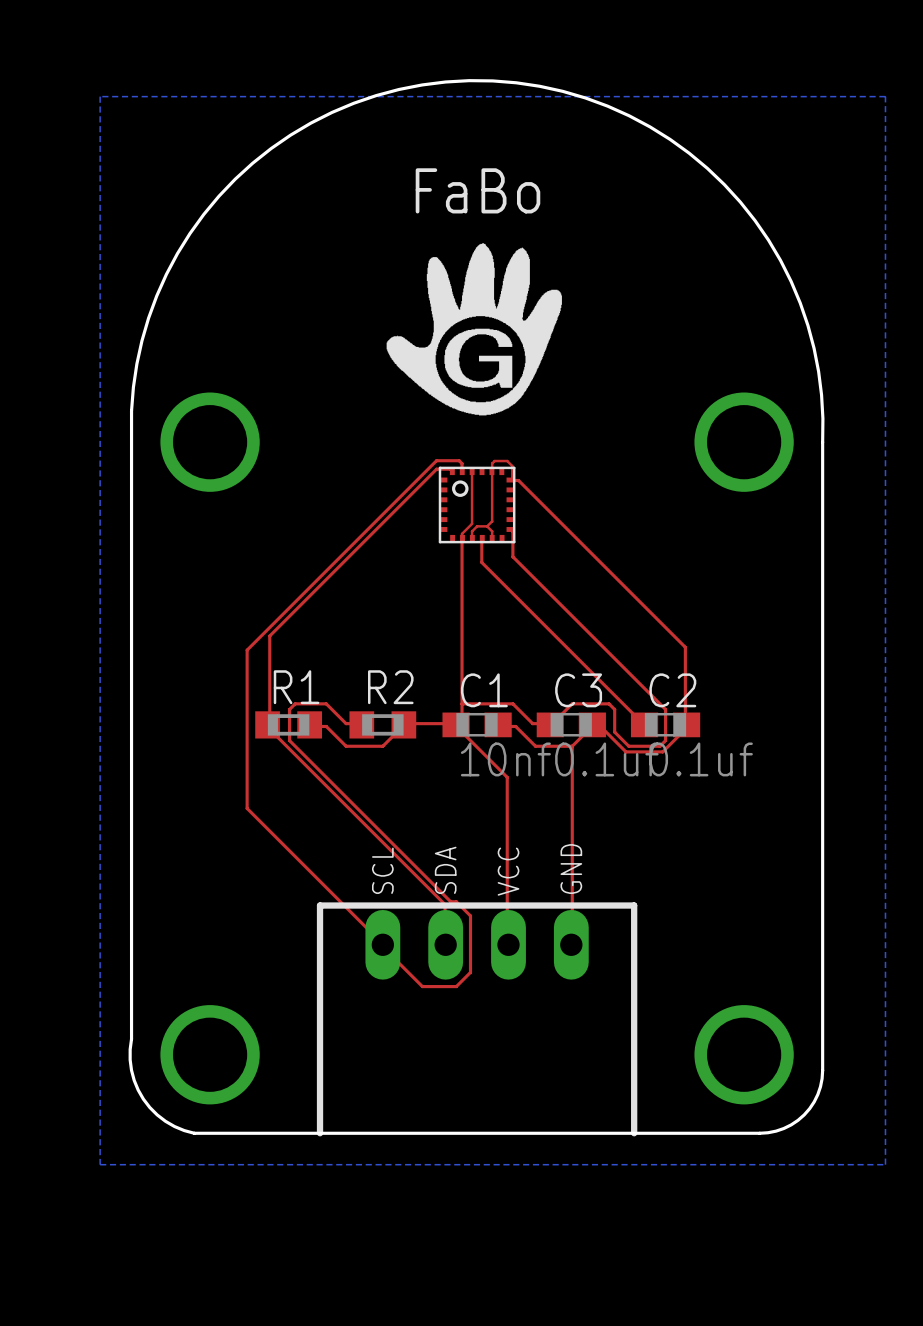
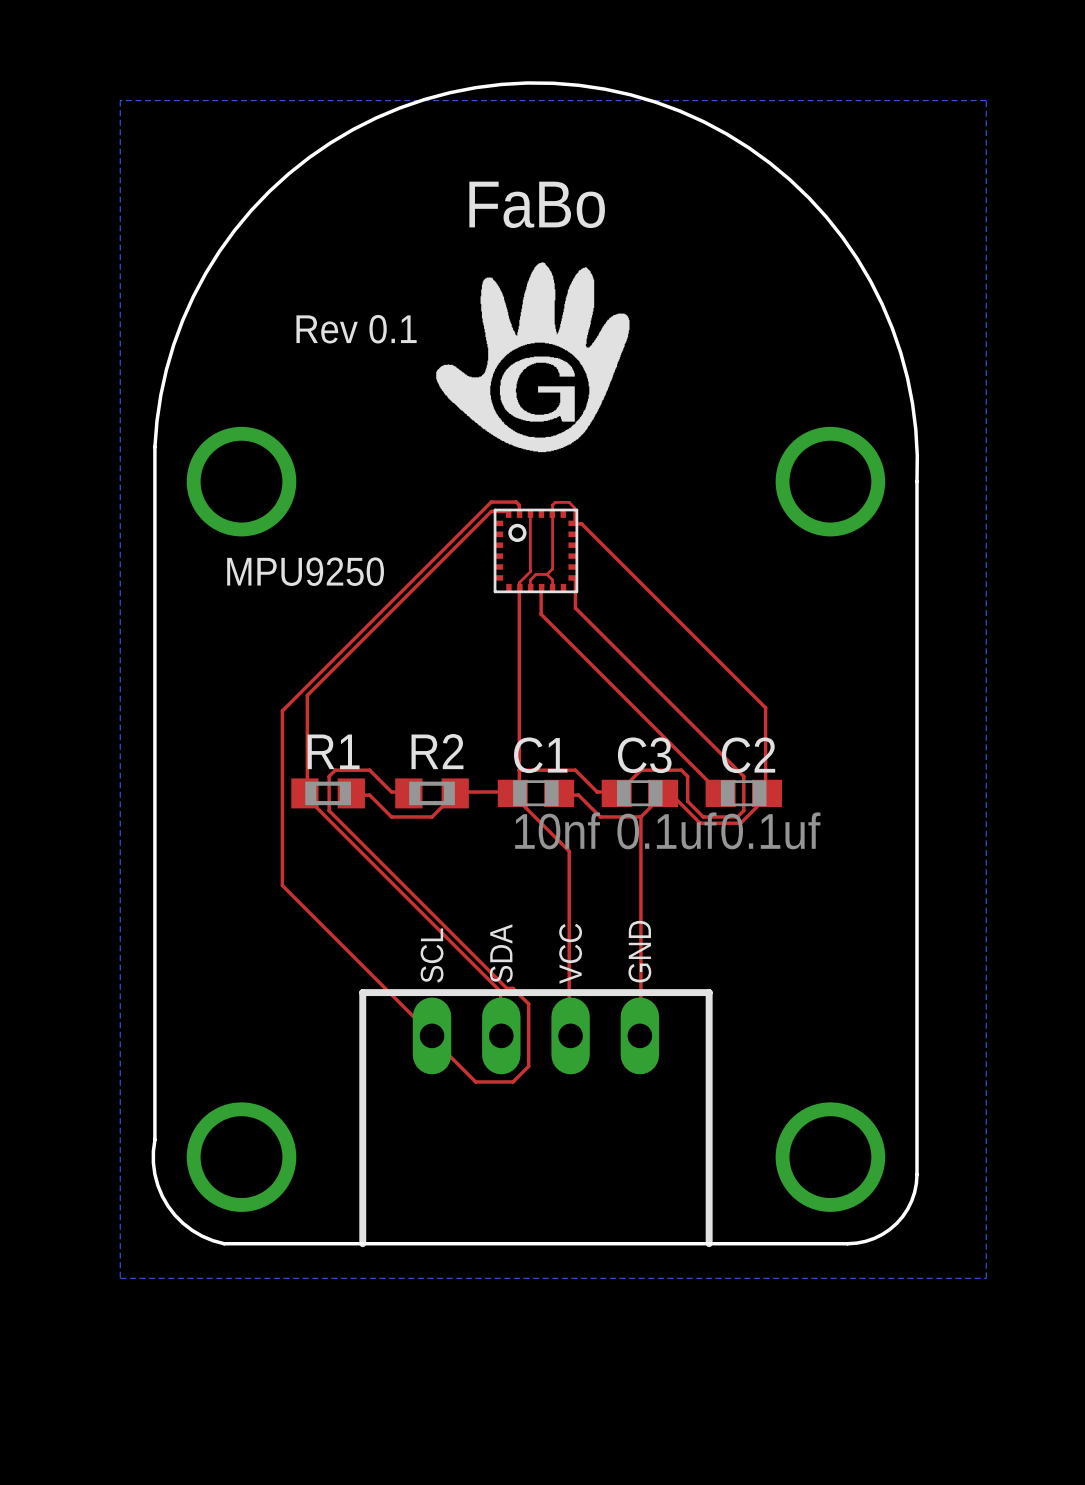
text: none -> Rev 0.1 (356, 329)
text: none -> MPU9250 (305, 571)

